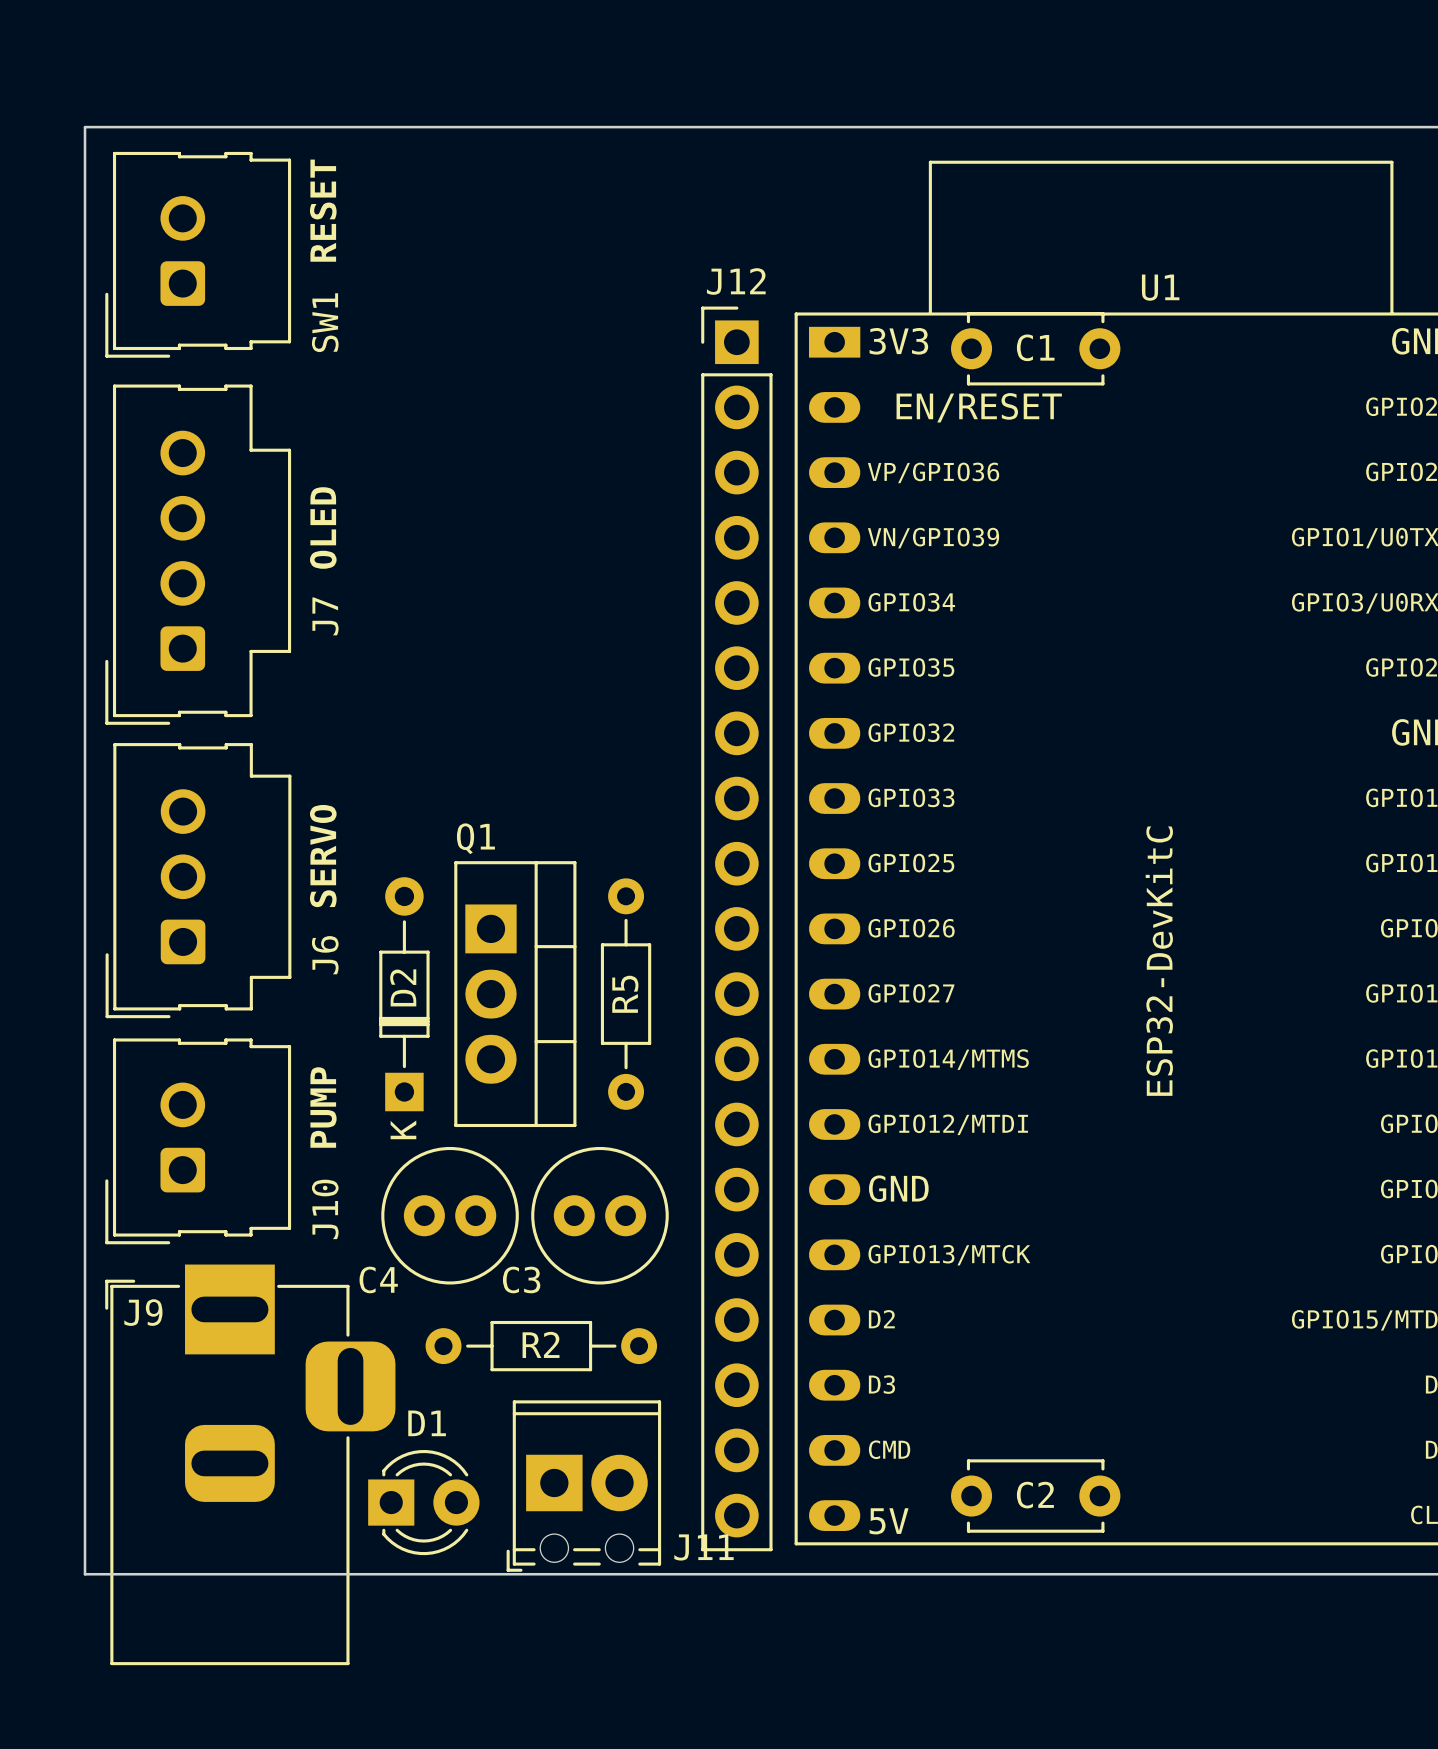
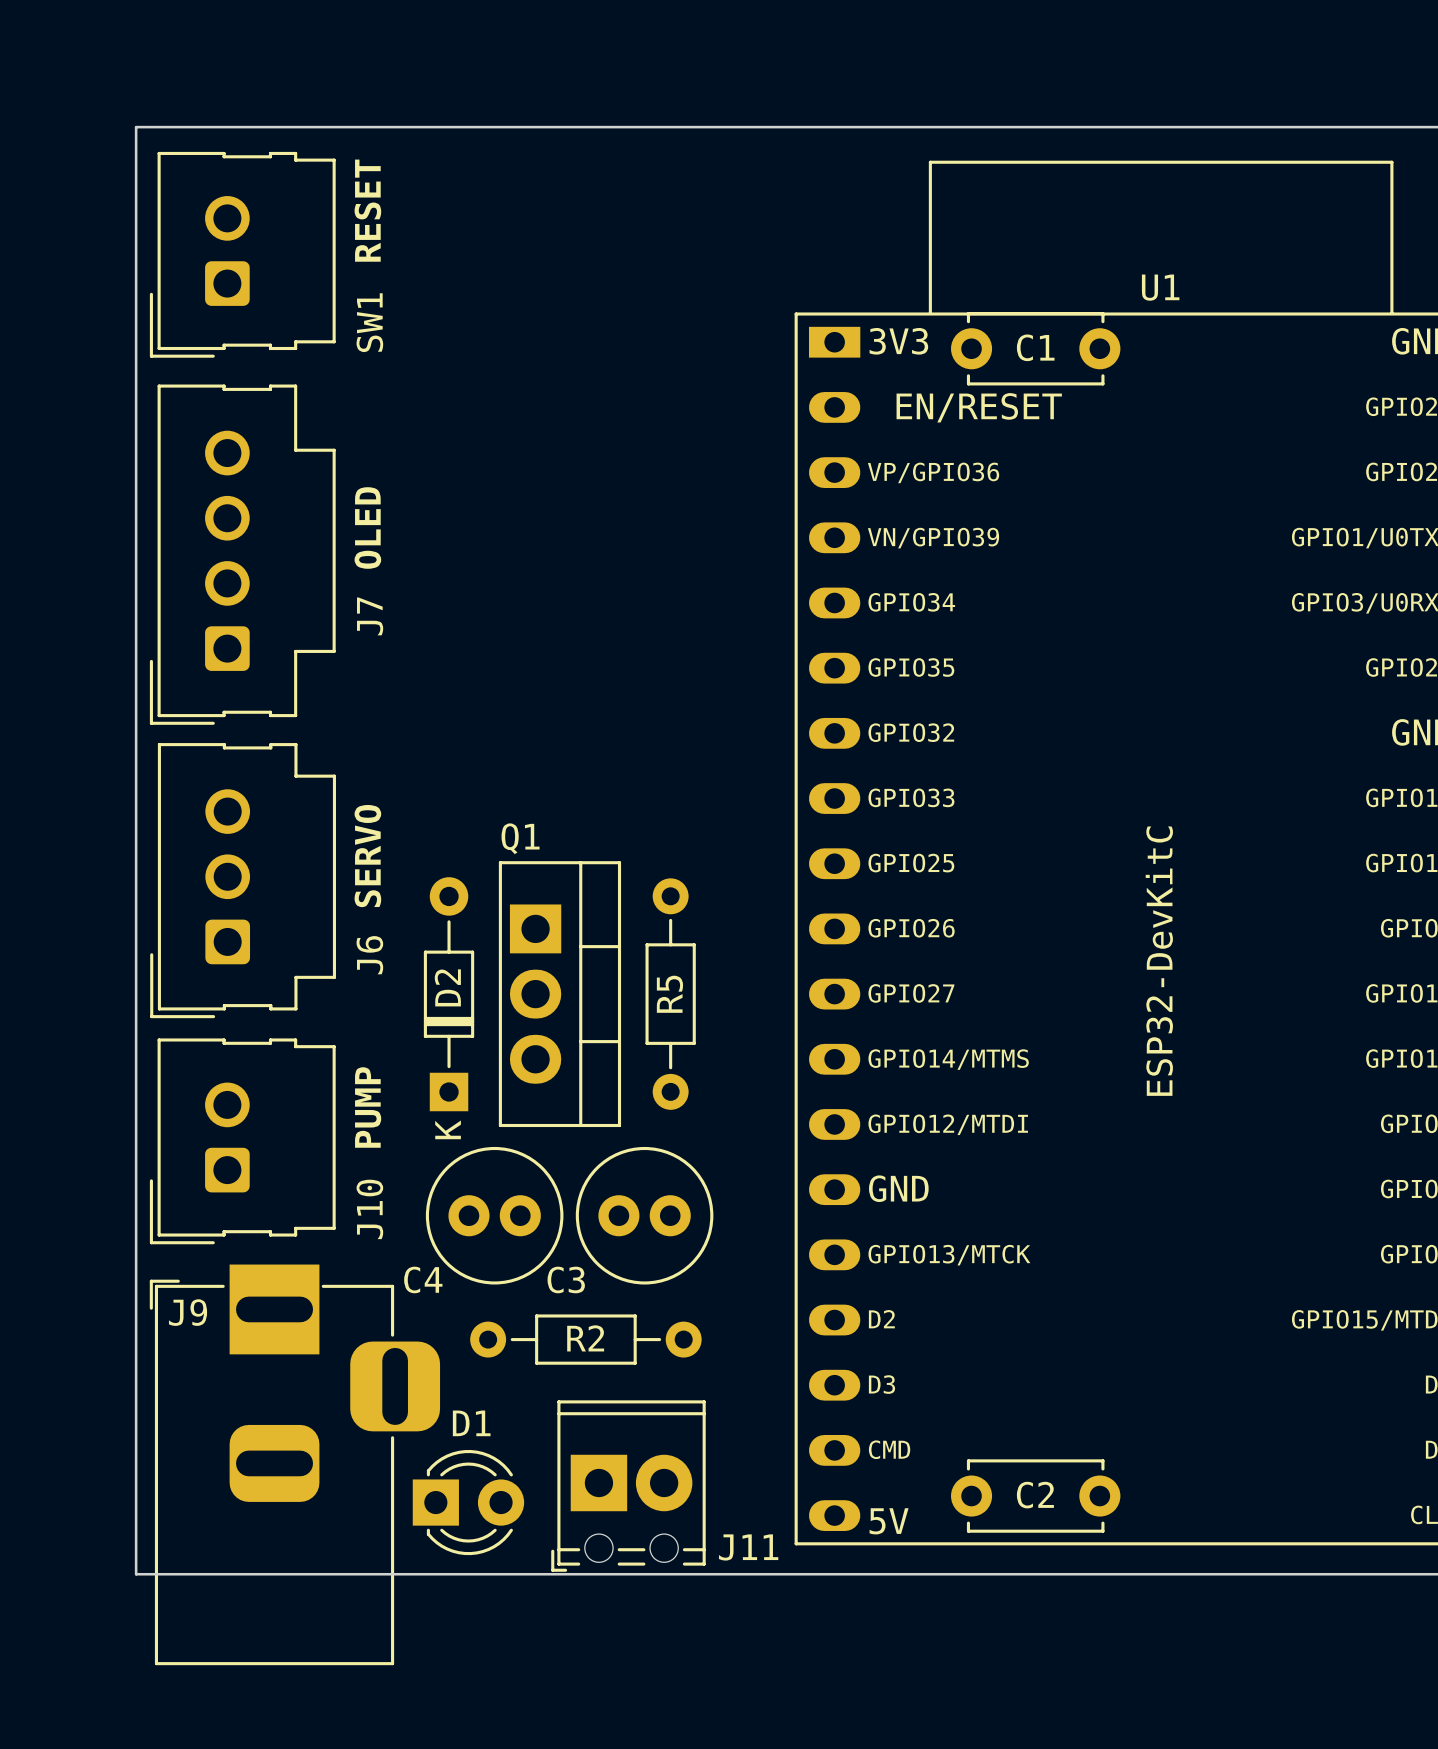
board edge: (136, 127) (85, 127) (85, 1574) (136, 1574) -> (136, 127) (136, 1574)
text position: RESET (323, 210) -> RESET (367, 210)
SW1 position: (198, 254) -> (242, 254)
text position: OLED (323, 527) -> OLED (367, 527)
J7 position: (198, 554) -> (242, 554)
text position: SERVO (323, 856) -> SERVO (367, 856)
J6 position: (198, 880) -> (243, 880)
J12: (736, 928) -> none
D2 position: (404, 994) -> (449, 994)
Q1 position: (515, 994) -> (559, 994)
R5 position: (626, 994) -> (670, 994)
text position: PUMP (323, 1107) -> PUMP (368, 1107)
J10 position: (198, 1141) -> (242, 1141)
C4 position: (450, 1215) -> (494, 1215)
C3 position: (599, 1215) -> (644, 1215)
R2 position: (541, 1346) -> (585, 1339)
J9 position: (250, 1464) -> (294, 1464)
J11 position: (583, 1486) -> (628, 1486)
D1 position: (423, 1502) -> (468, 1502)

